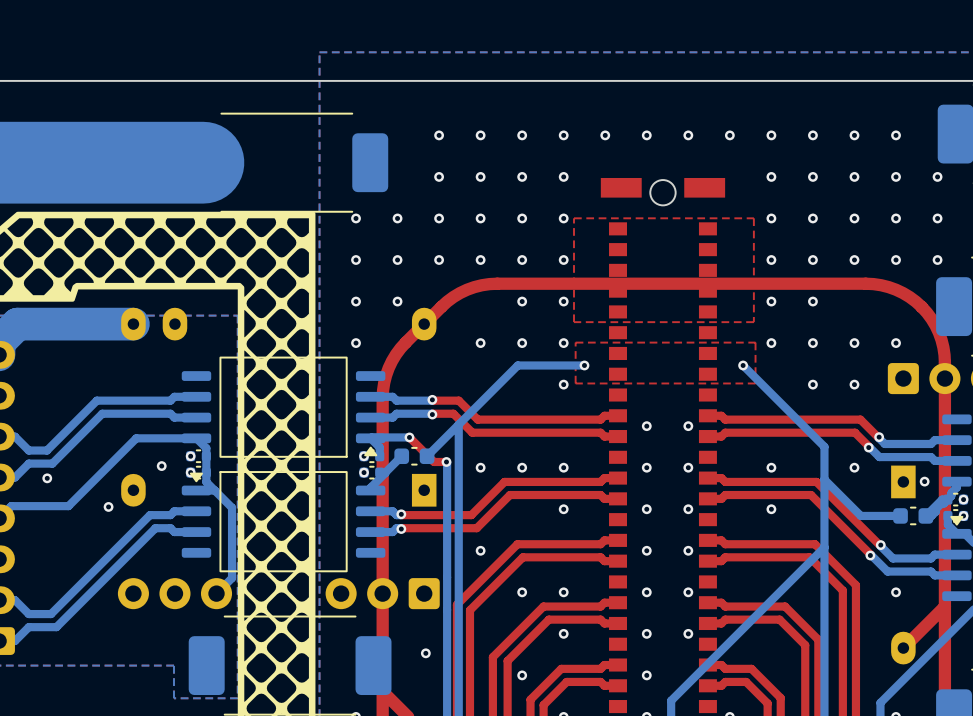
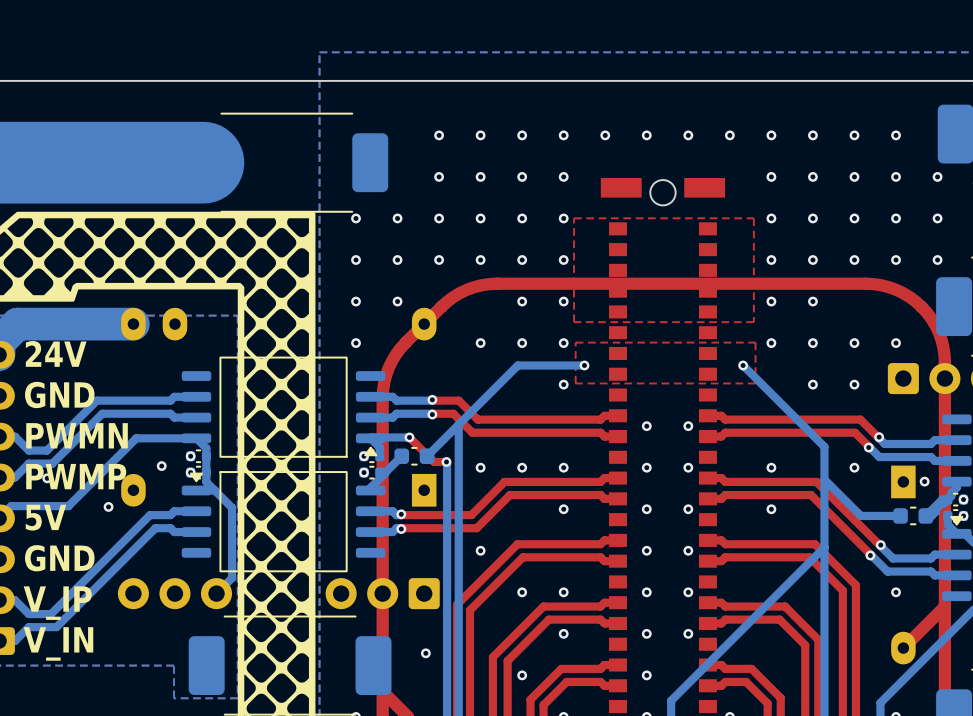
text: none -> 24V (56, 353)
text: none -> GND (59, 394)
text: none -> PWMN (77, 435)
text: none -> PWMP (76, 476)
text: none -> 5V (46, 517)
text: none -> GND (59, 558)
text: none -> V_IP (57, 603)
text: none -> V_IN (58, 643)

